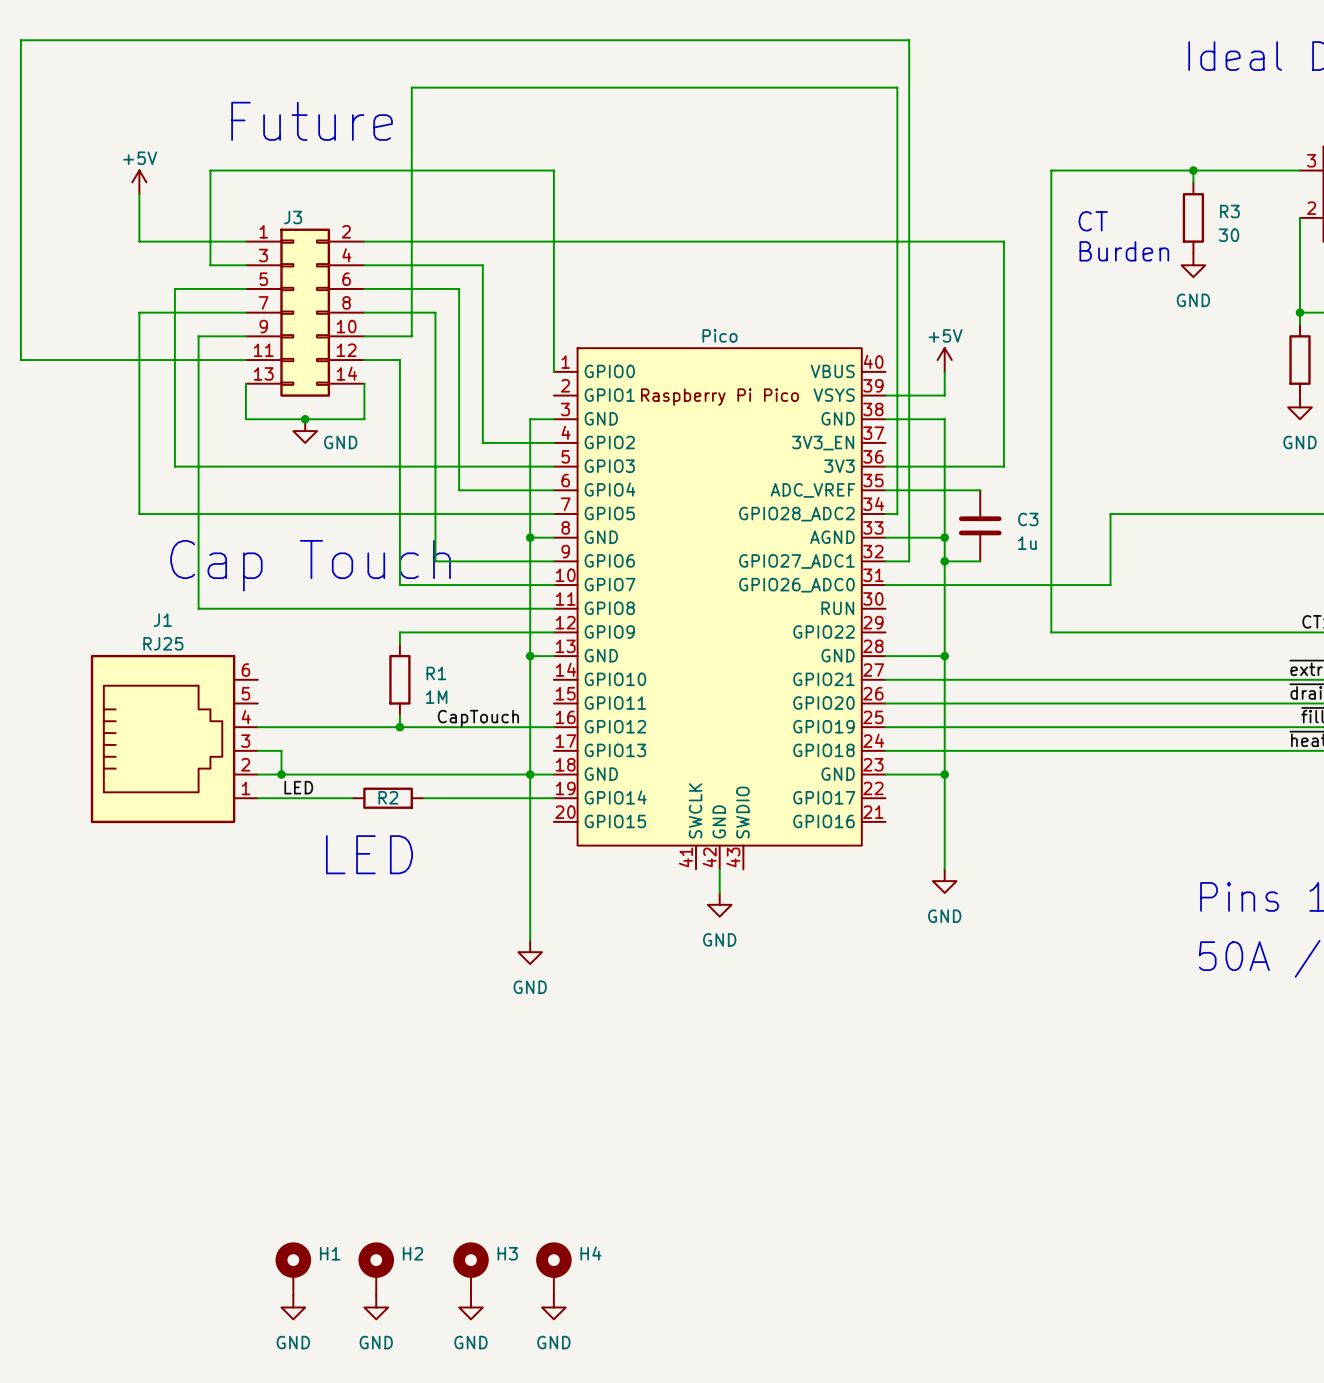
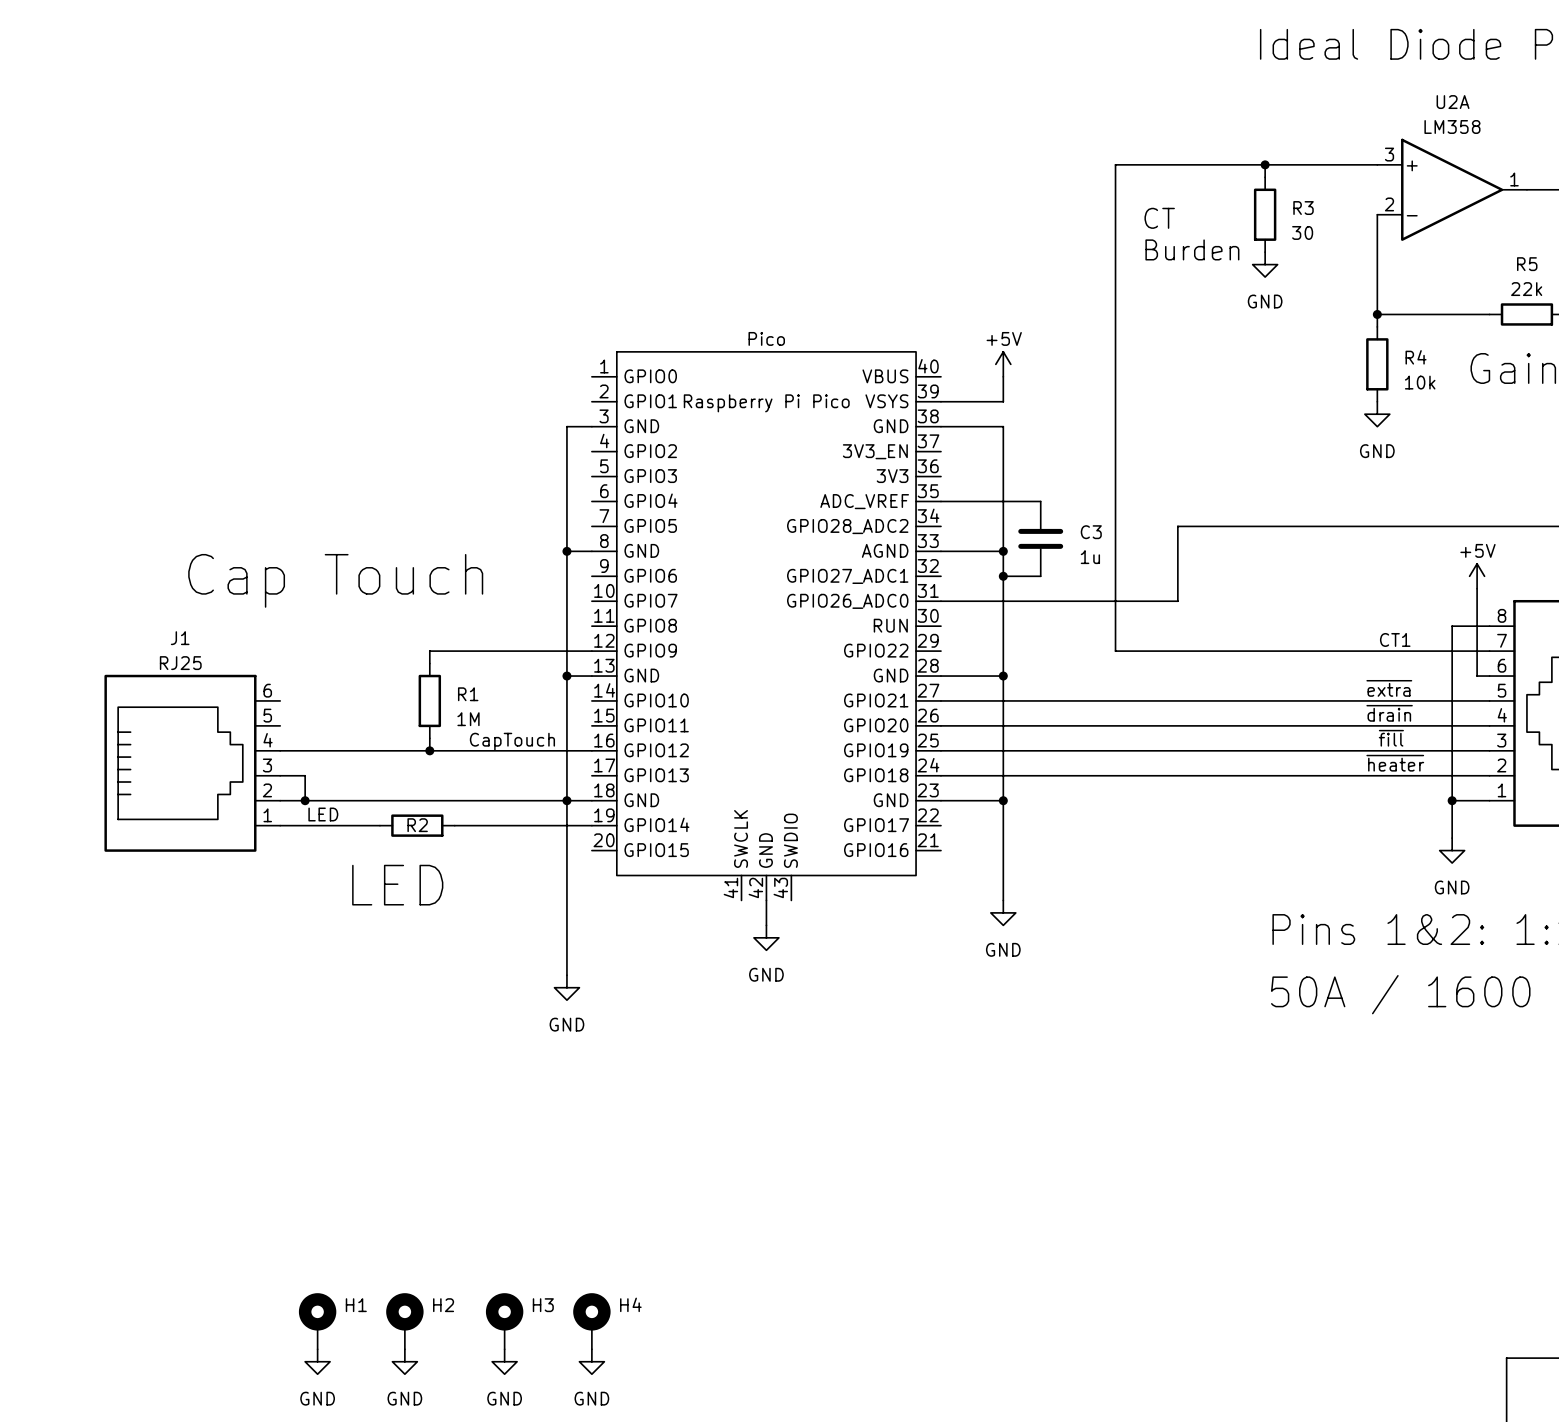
text: Future (312, 121) -> none
power symbol: +5V (139, 182) -> none
wire: (139, 194) (139, 241) (245, 241) -> none
wire: (364, 241) (1003, 241) (1003, 466) (885, 466) -> none
wire: (245, 265) (210, 265) (210, 170) (553, 170) (553, 371) -> none
wire: (364, 265) (482, 265) (482, 442) (553, 442) -> none
wire: (245, 288) (174, 288) (174, 466) (553, 466) -> none
wire: (364, 288) (459, 288) (459, 490) (553, 490) -> none
wire: (245, 312) (139, 312) (139, 513) (553, 513) -> none
J3: (305, 312) -> none
wire: (364, 312) (435, 312) (435, 561) (553, 561) -> none
wire: (245, 336) (198, 336) (198, 608) (553, 608) -> none
wire: (364, 336) (411, 336) (411, 87) (897, 87) (897, 513) (885, 513) -> none
wire: (245, 360) (20, 360) (20, 40) (909, 40) (909, 561) (885, 561) -> none
wire: (364, 360) (399, 360) (399, 585) (553, 585) -> none
wire: (245, 383) (245, 419) (364, 419) (364, 383) -> none
junction: (305, 419) -> none
power symbol: GND (305, 431) -> none

